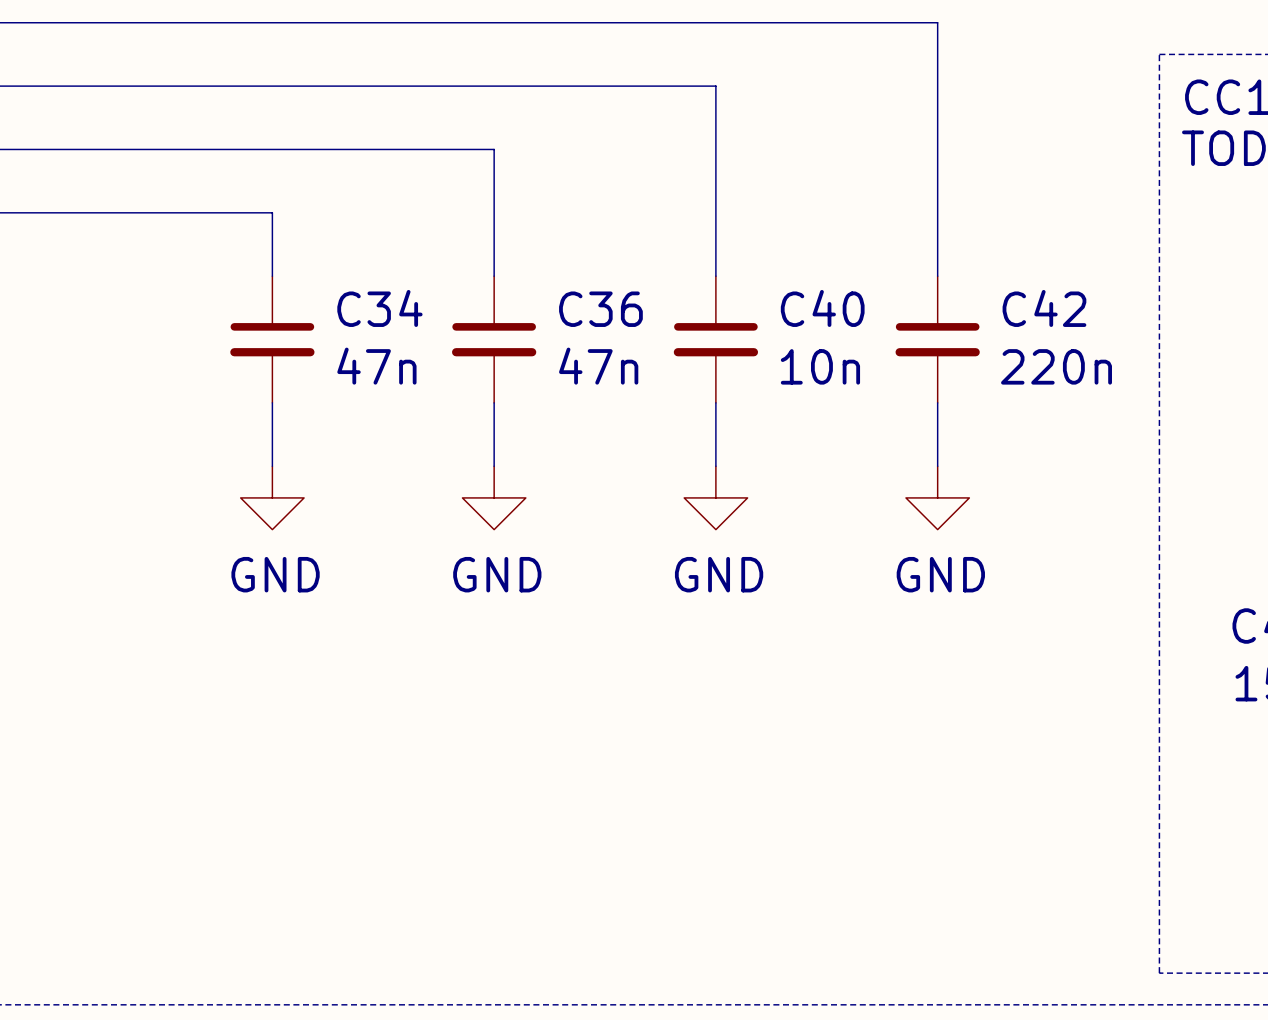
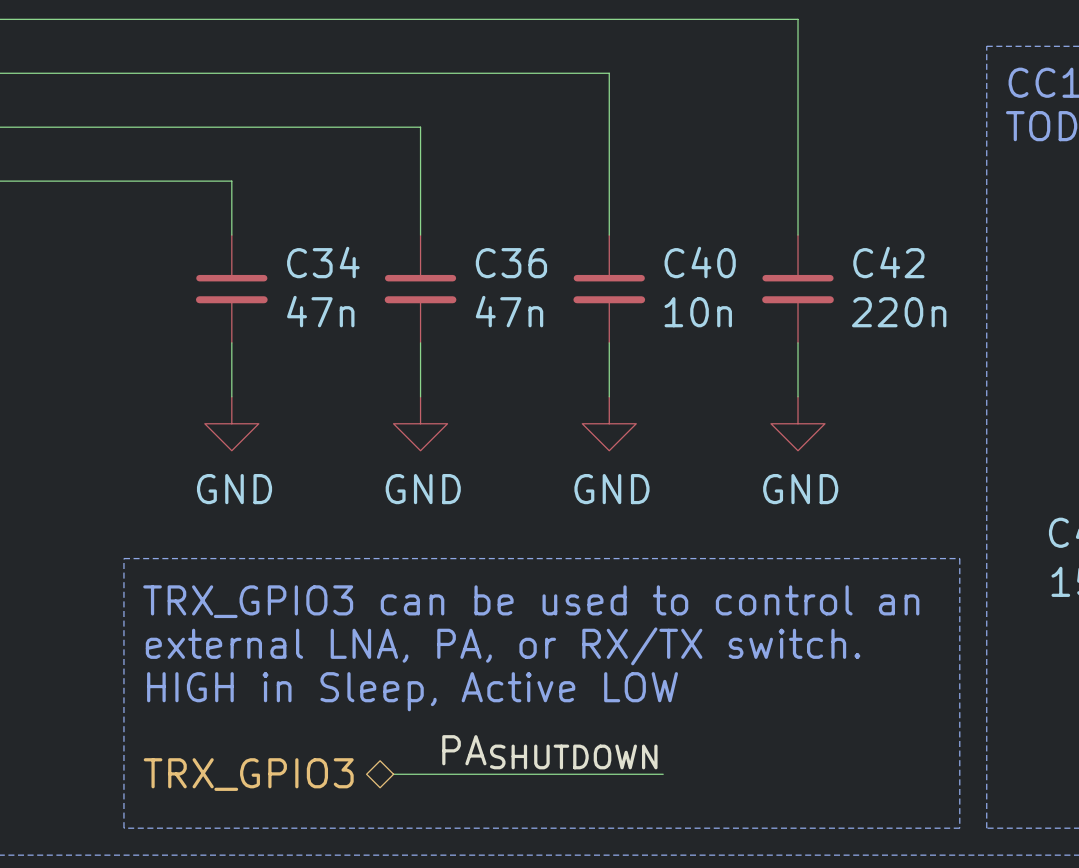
line: none -> (123, 558) (959, 558) (959, 828) (123, 828) (123, 558)
text: none -> TRX_GPIO3 can be used to control an (531, 601)
text: none -> external LNA, PA, or RX/TX switch. (503, 646)
text: none -> HIGH in Sleep, Active LOW (412, 691)
label: none -> PASHUTDOWN (549, 752)
wire: none -> (393, 774) (663, 774)
hierarchical label: none -> TRX_GPIO3 (248, 774)

